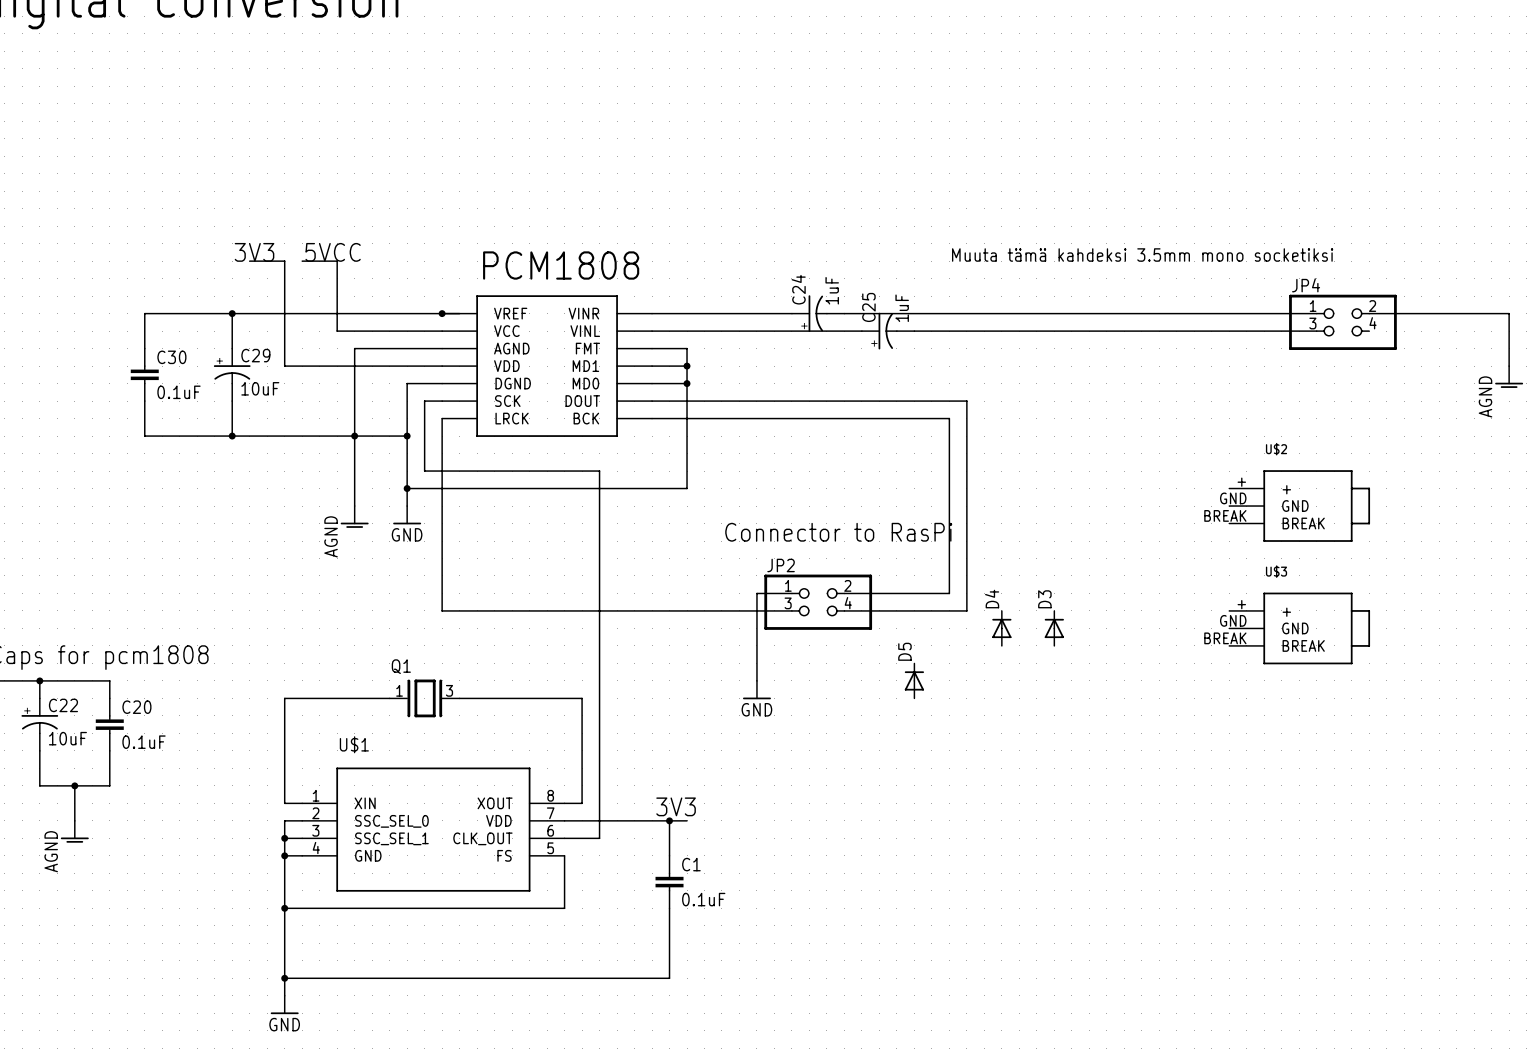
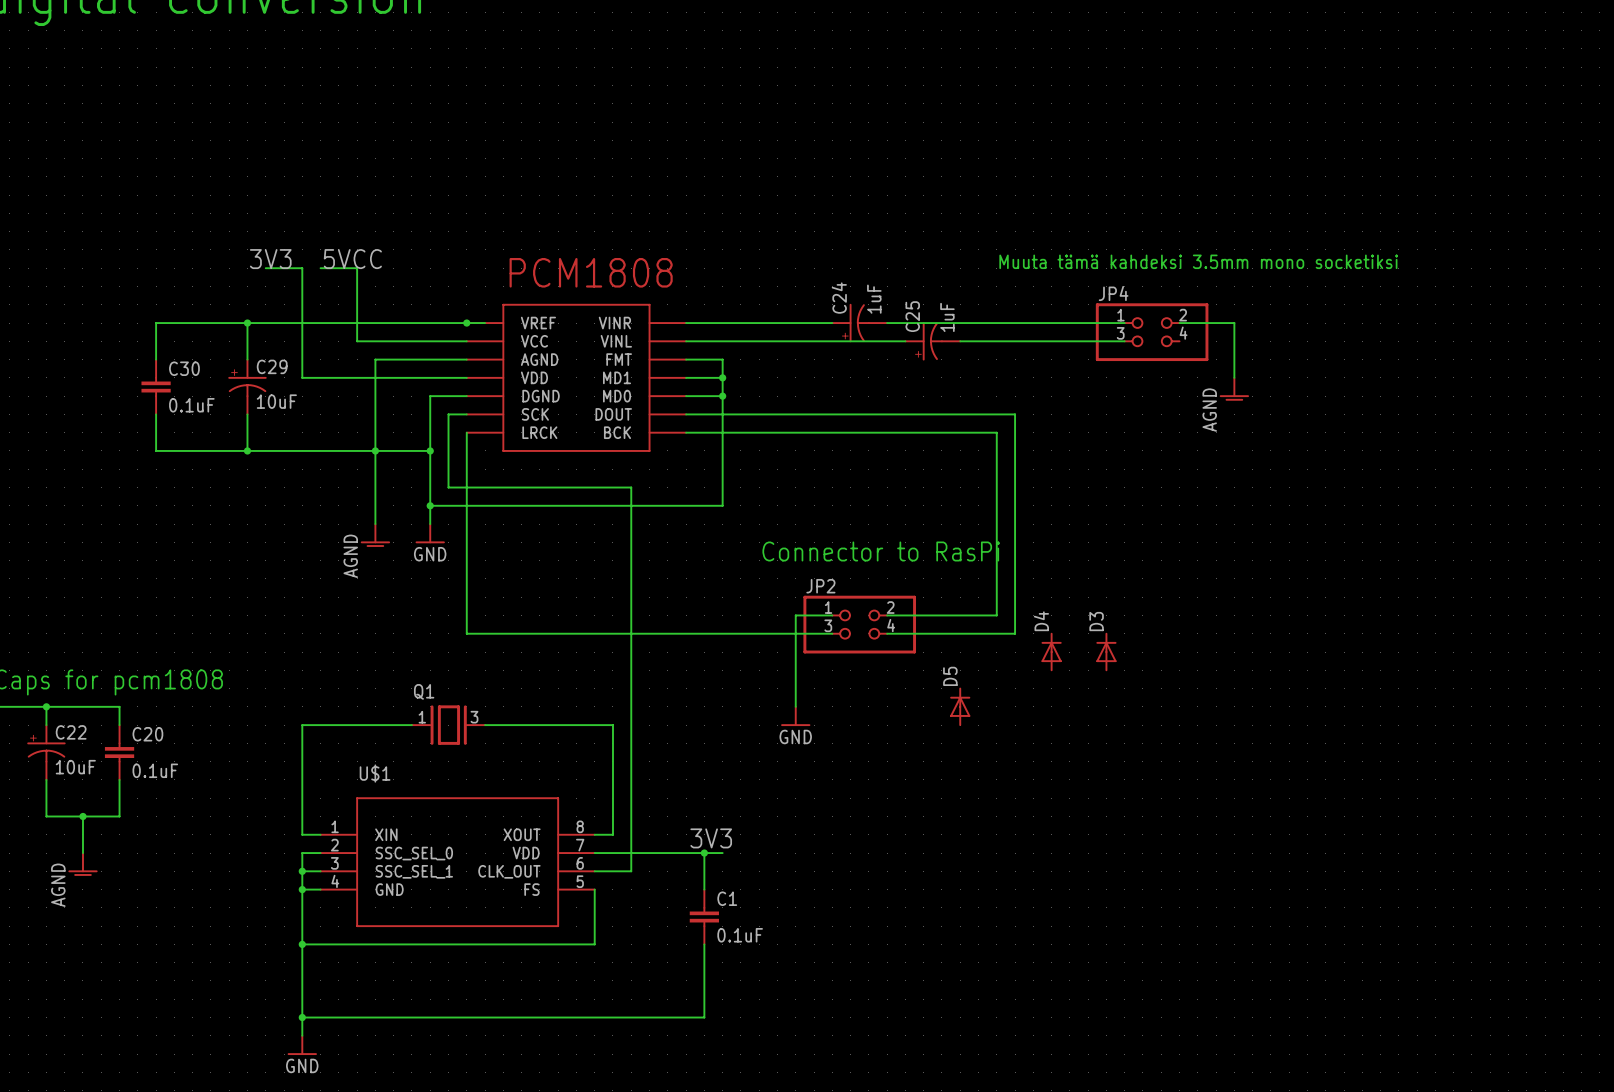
wire: (1071, 313) (1124, 313) -> none
wire: (1176, 313) (1316, 313) -> (1234, 323) (1234, 377)
wire: (1369, 313) (1509, 313) (1509, 366) -> none
JP4 position: (1342, 322) -> (1152, 332)
wire: (1071, 331) (1316, 331) -> none
power symbol: none -> AGND (1234, 389)
power symbol: AGND (1509, 377) -> none
U$2: (1299, 506) -> none
U$3: (1299, 628) -> none

